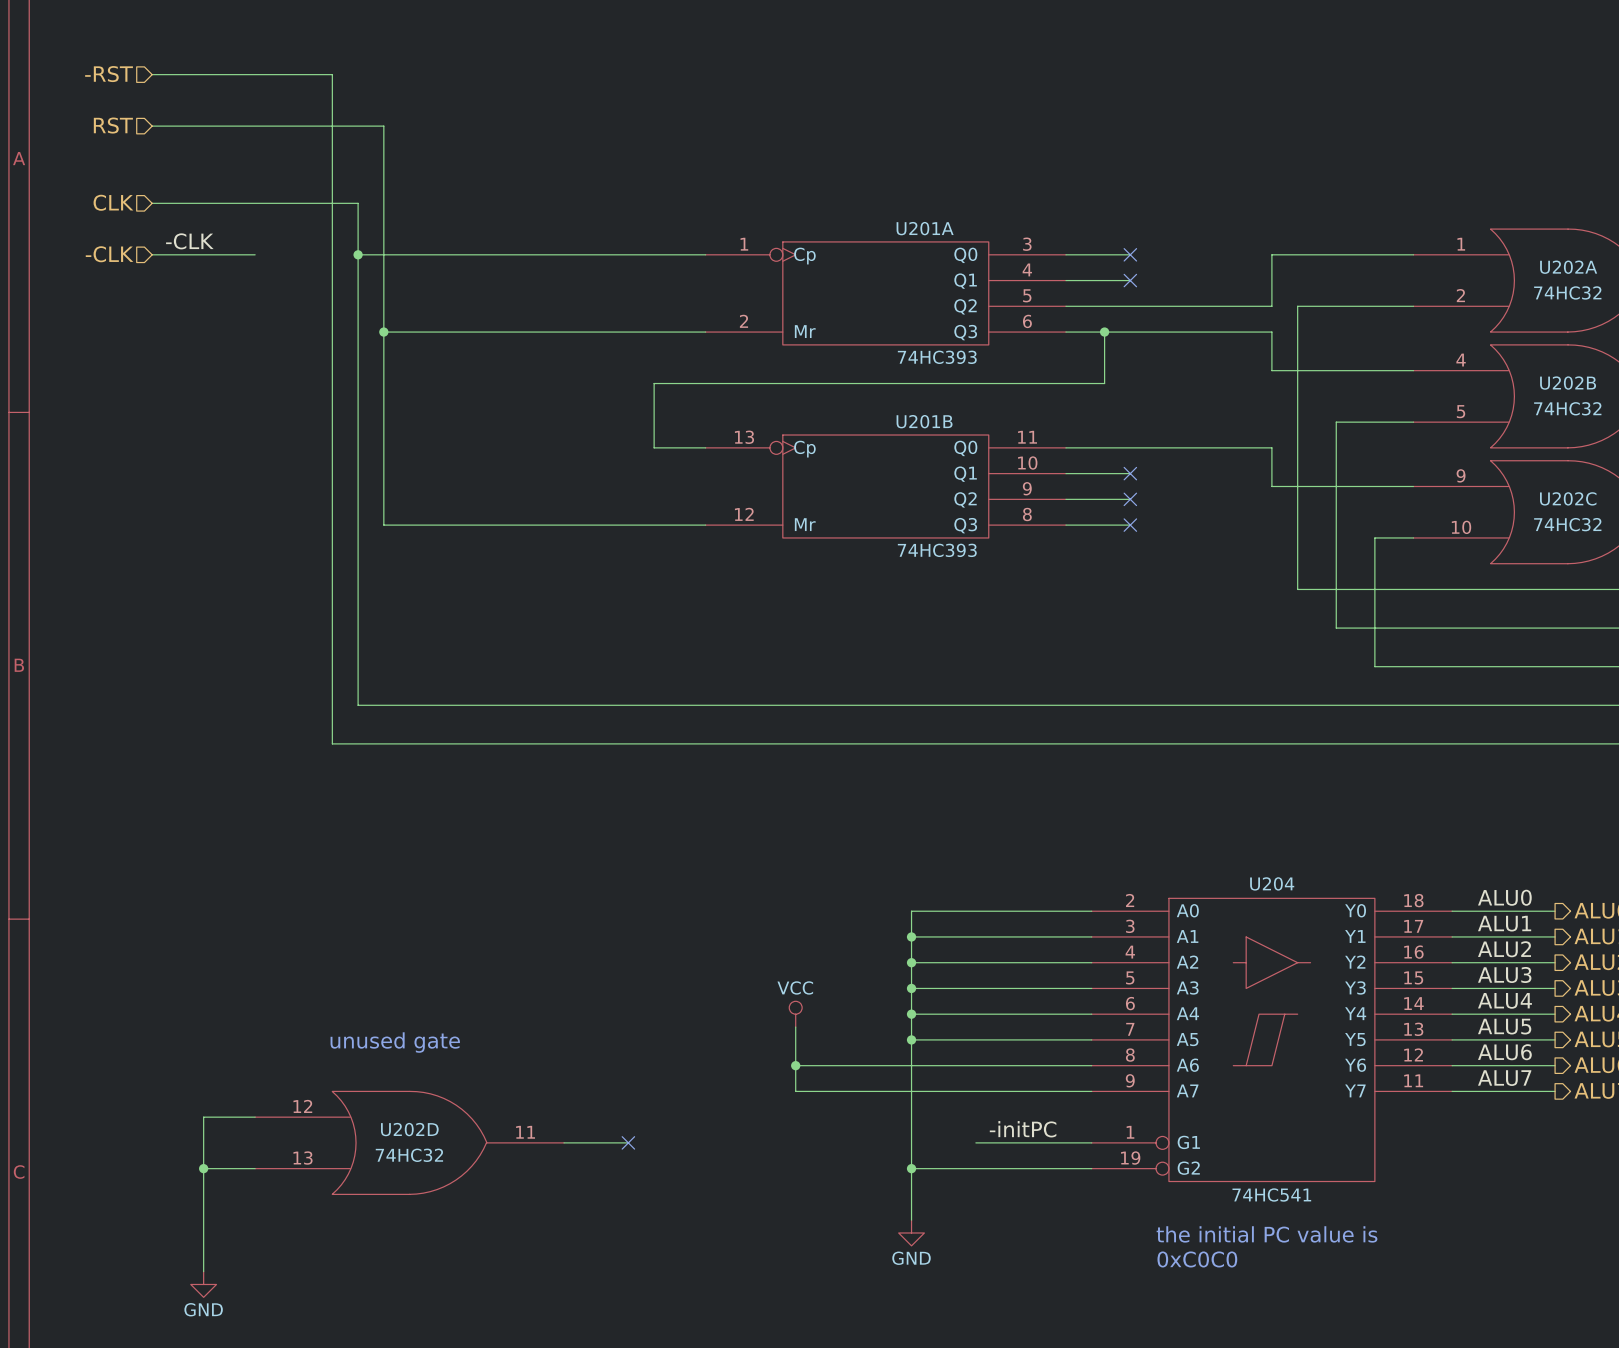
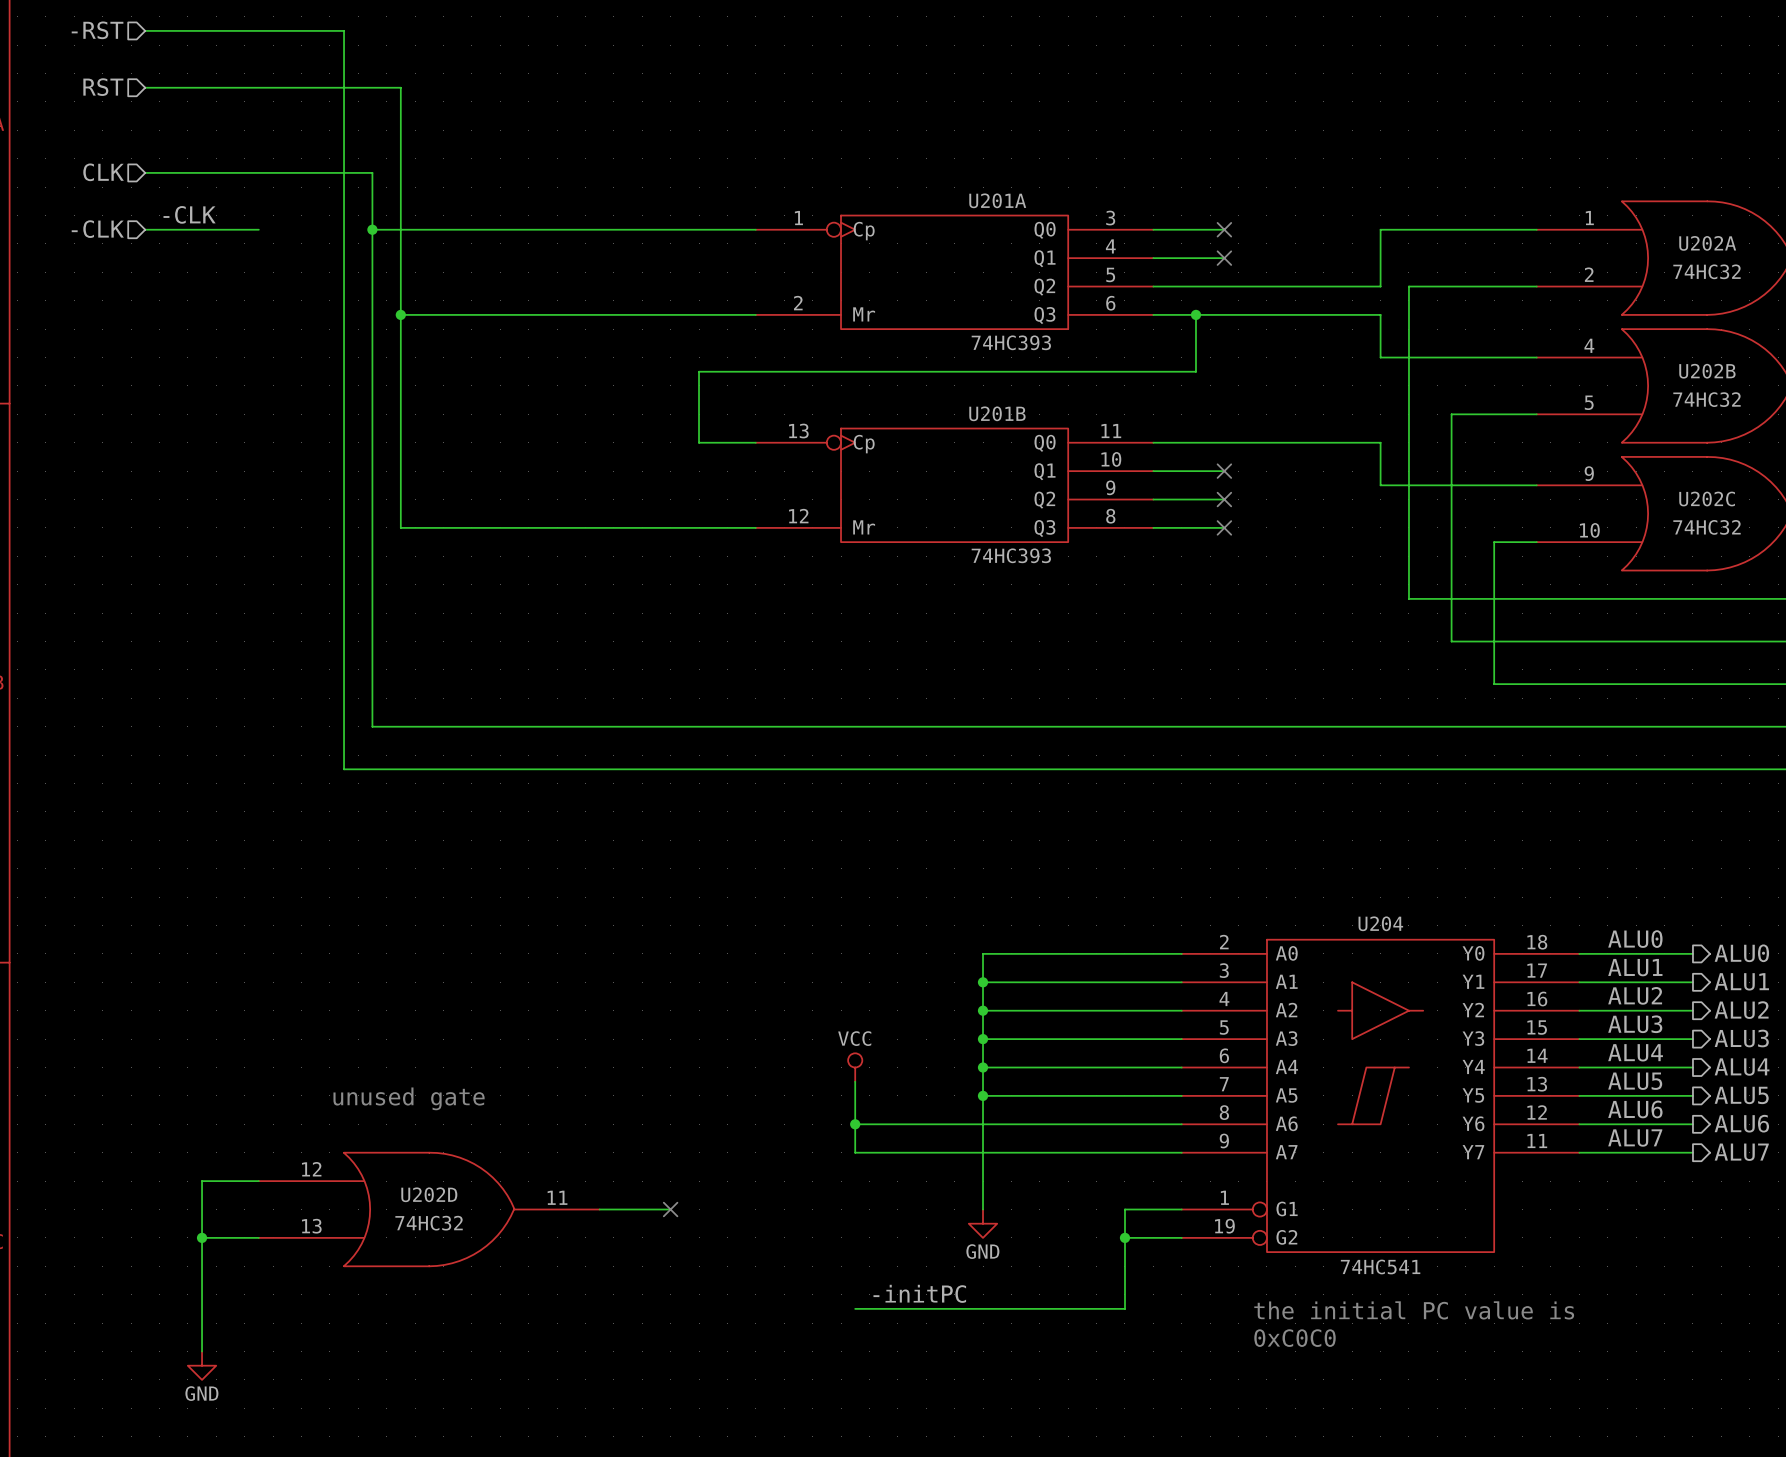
label position: -initPC (1023, 1129) -> -initPC (919, 1293)
wire: (911, 1142) (911, 1220) -> none
wire: (975, 1142) (1040, 1142) -> (855, 1308) (1124, 1308) (1124, 1209)
wire: (911, 1168) (1040, 1168) -> none
junction: (911, 1168) -> none
junction: none -> (1124, 1237)
power symbol position: GND (911, 1232) -> GND (983, 1223)

